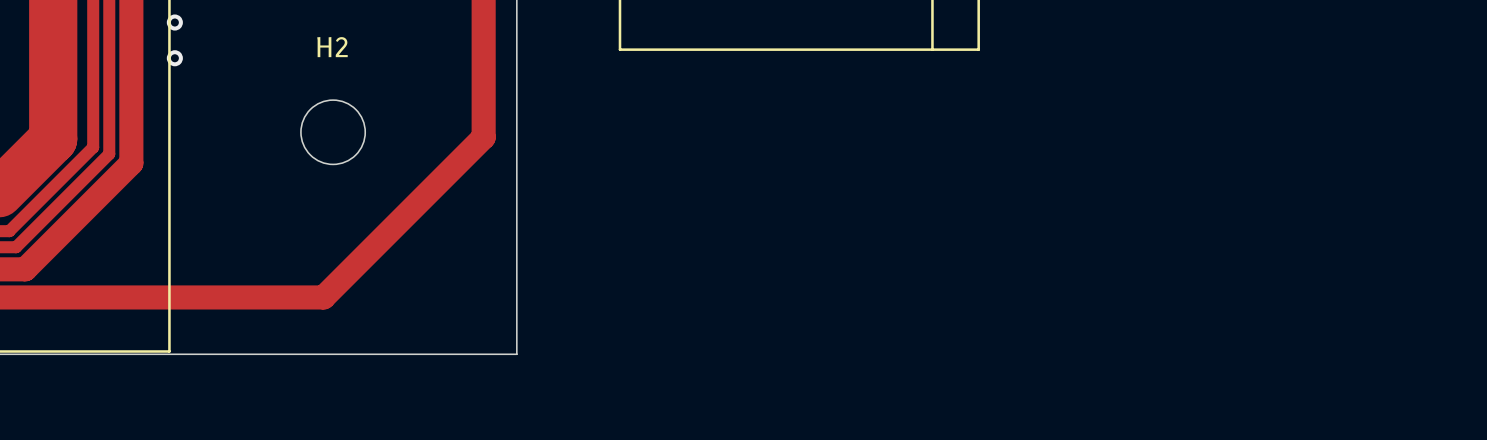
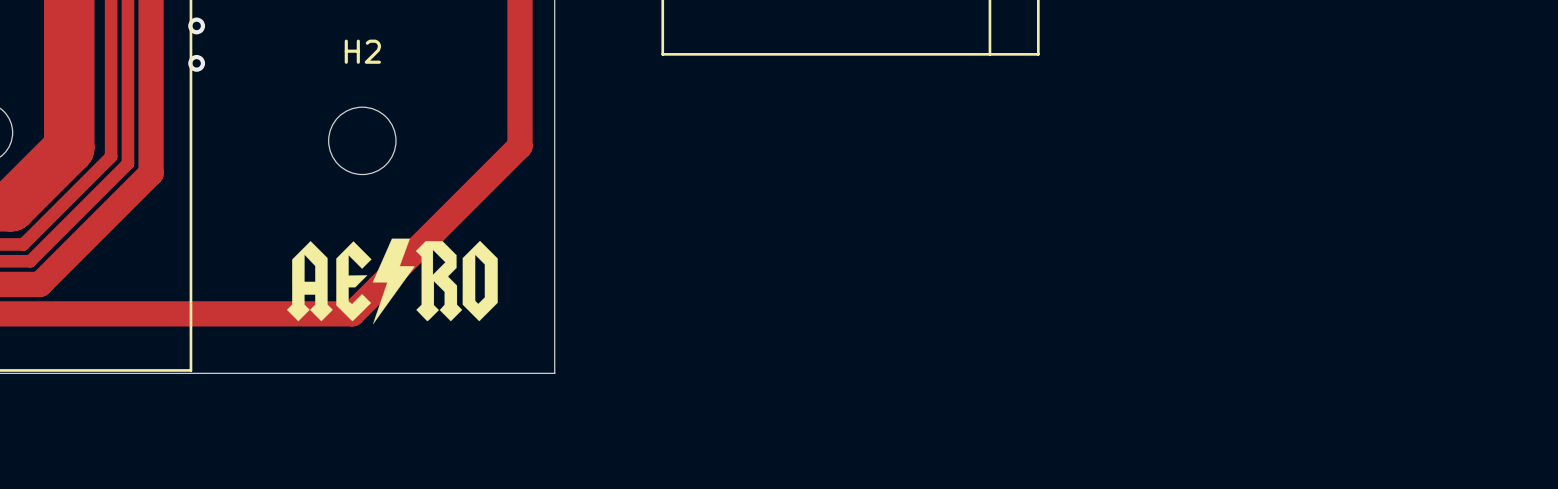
drawing: none -> [286, 238, 498, 325]

